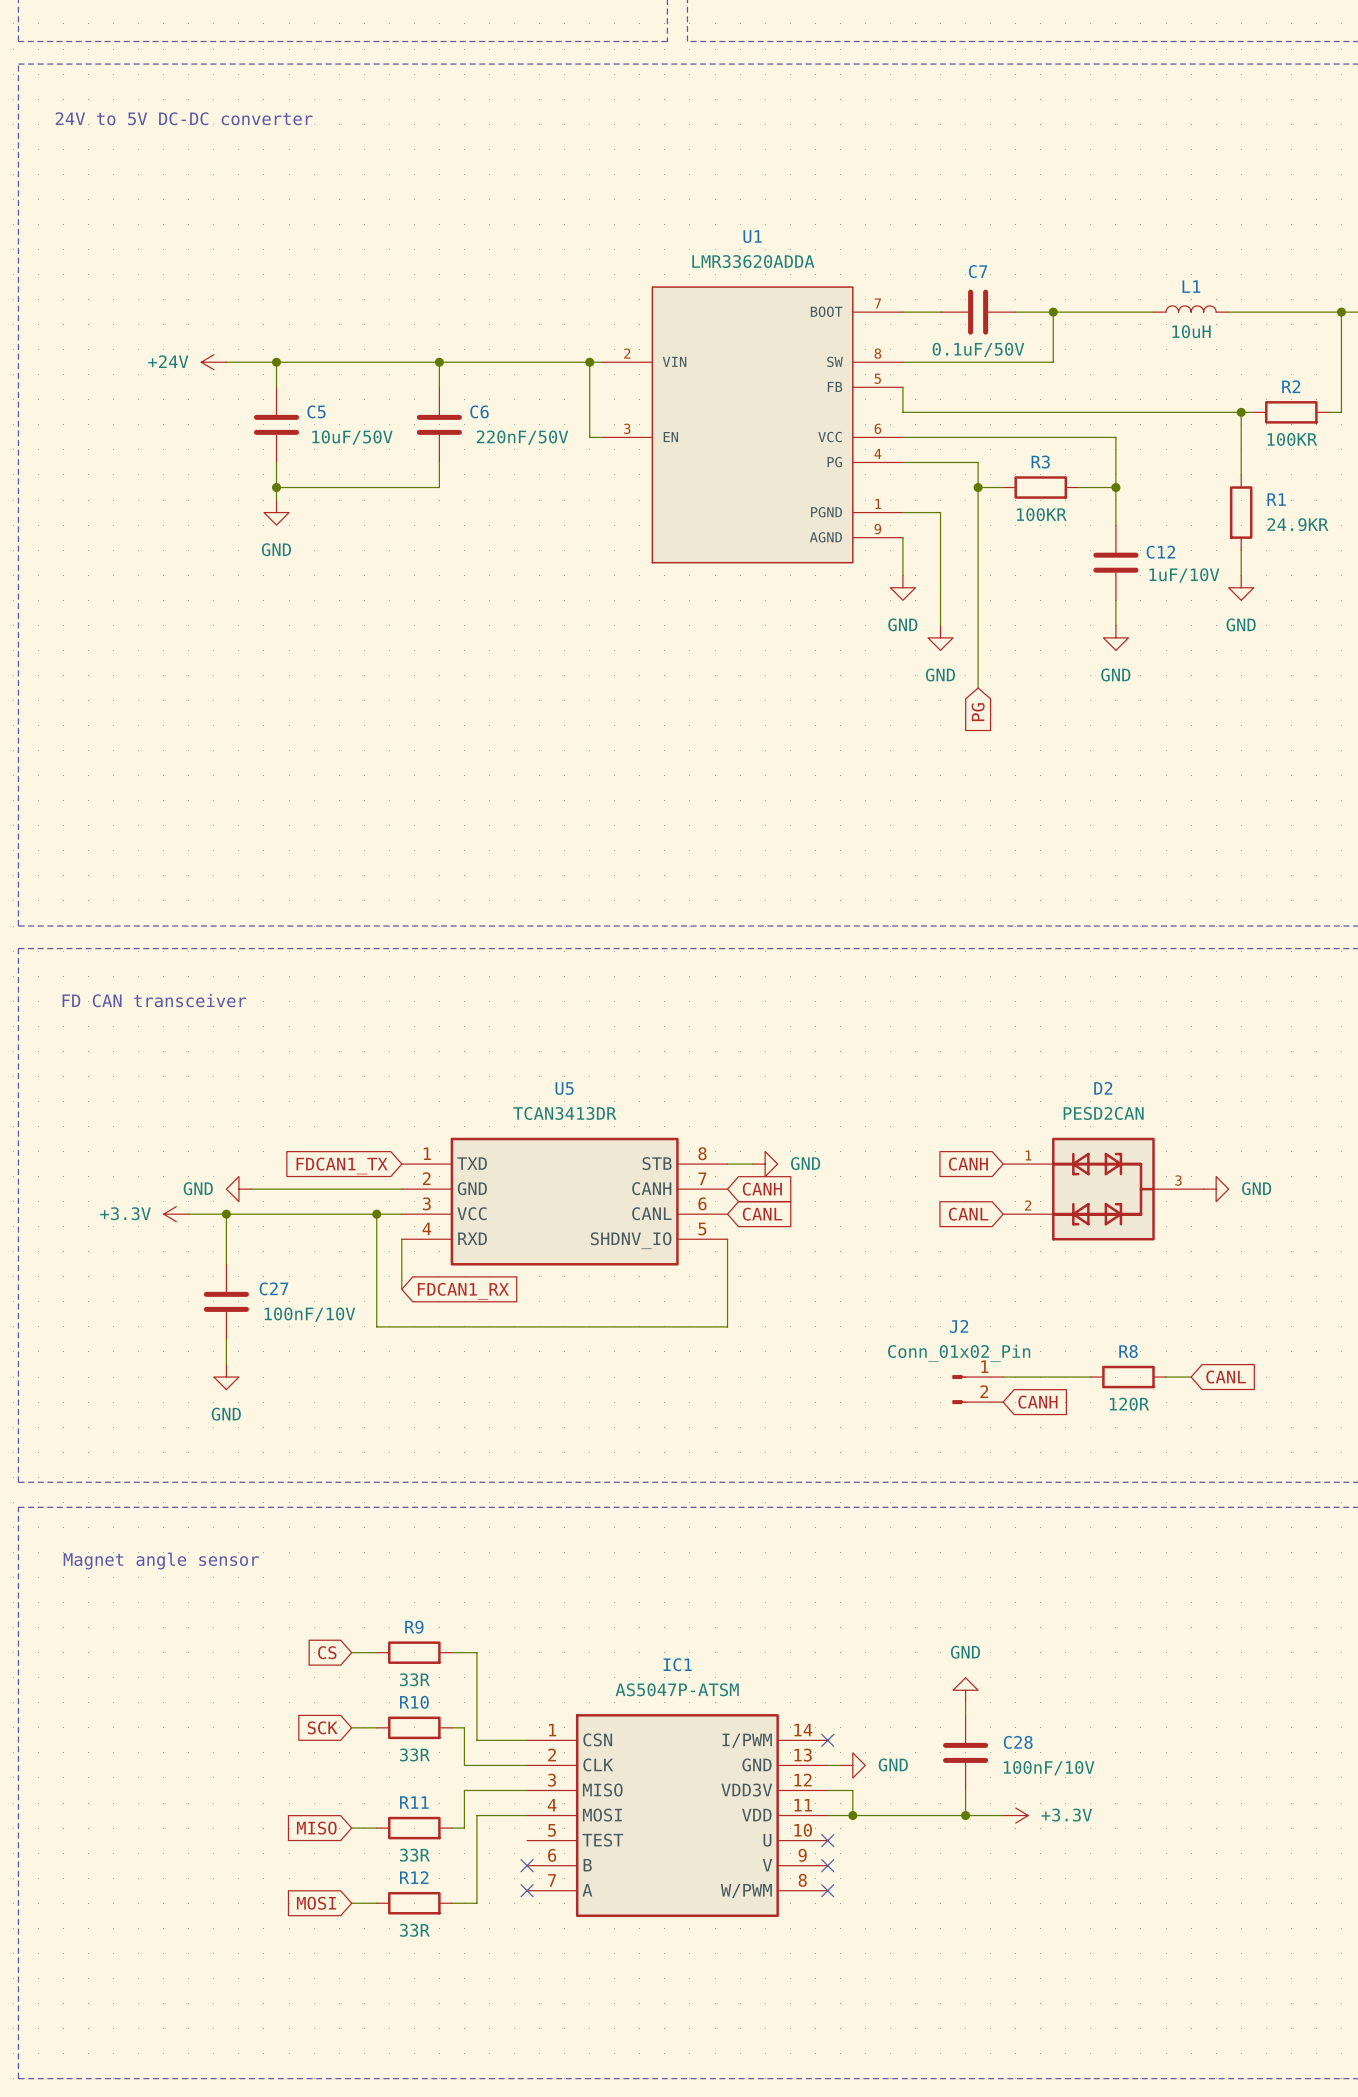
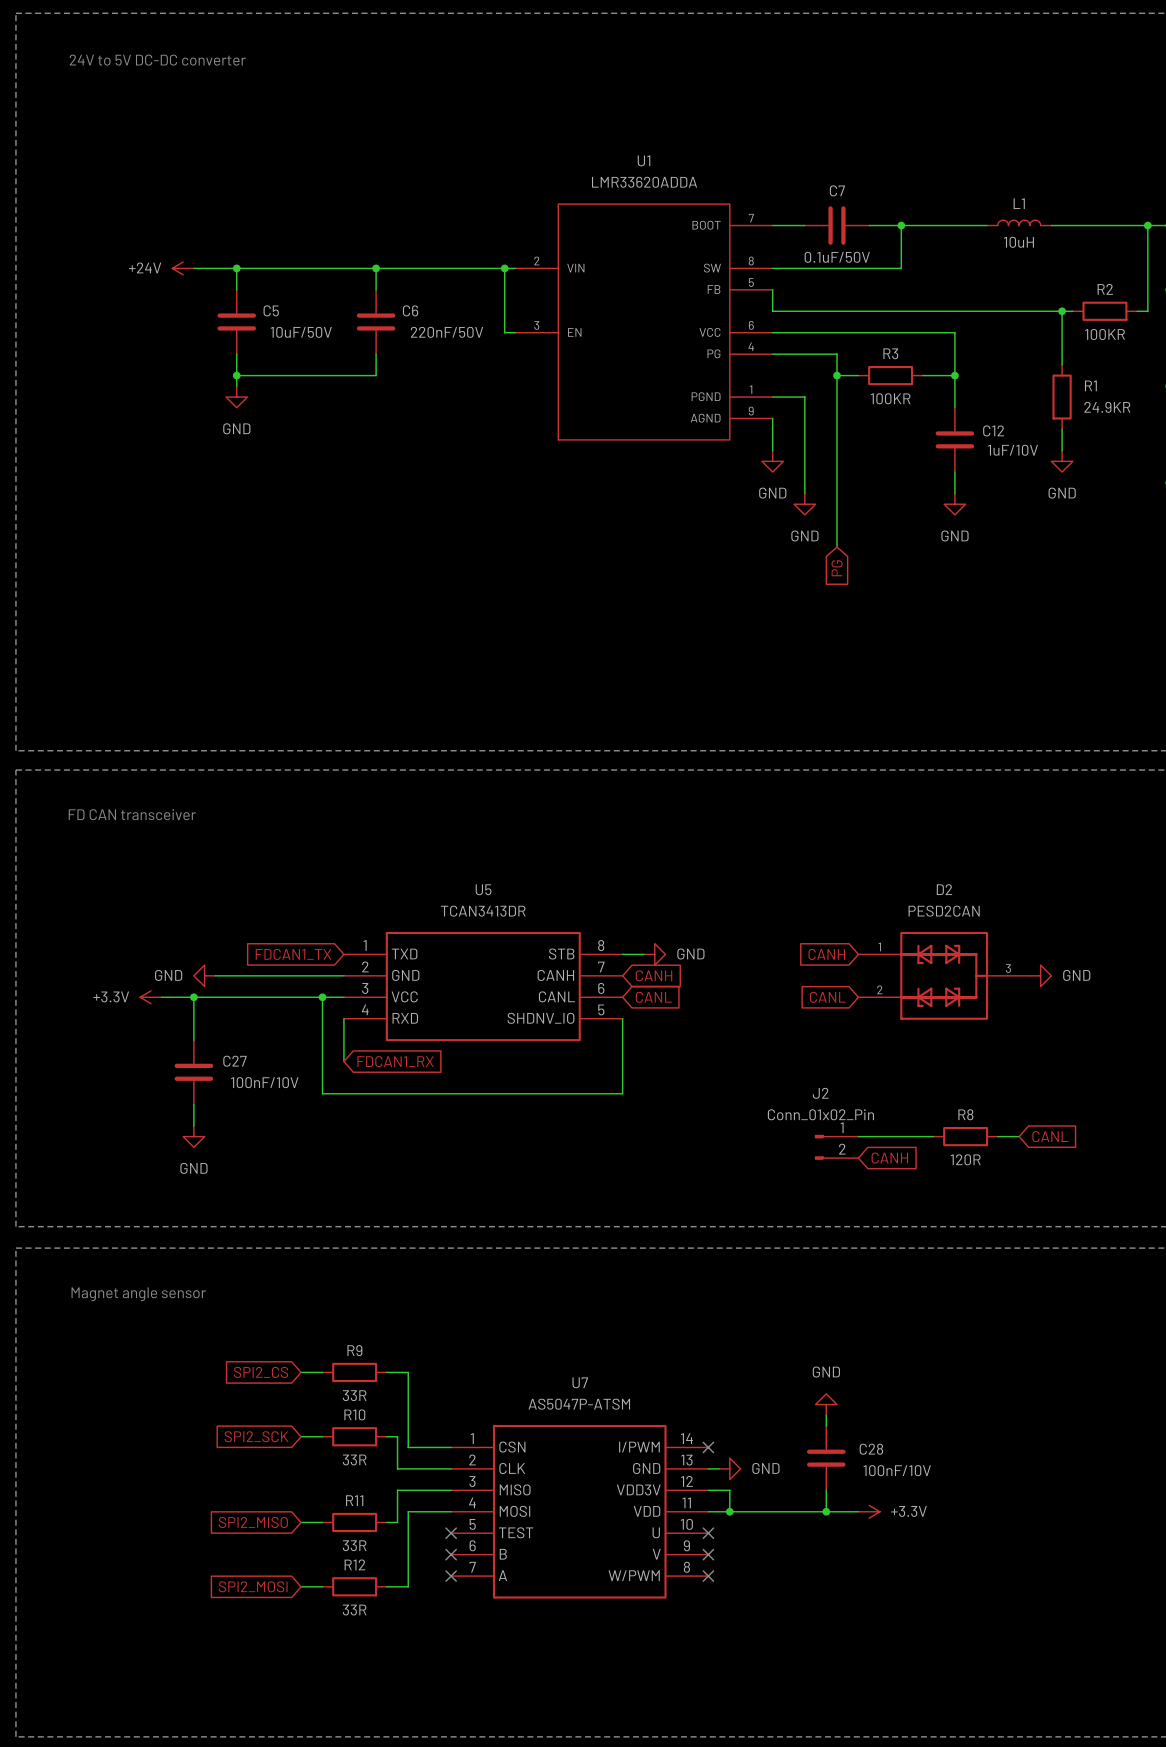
global label: CS (327, 1652) -> SPI2_CS (261, 1372)
IC1 name: IC1 (677, 1664) -> U7 (580, 1382)
global label: SCK (322, 1727) -> SPI2_SCK (256, 1436)
global label: MISO (316, 1828) -> SPI2_MISO (253, 1522)
no-connect mark: none -> (451, 1533)
global label: MOSI (316, 1903) -> SPI2_MOSI (253, 1586)

